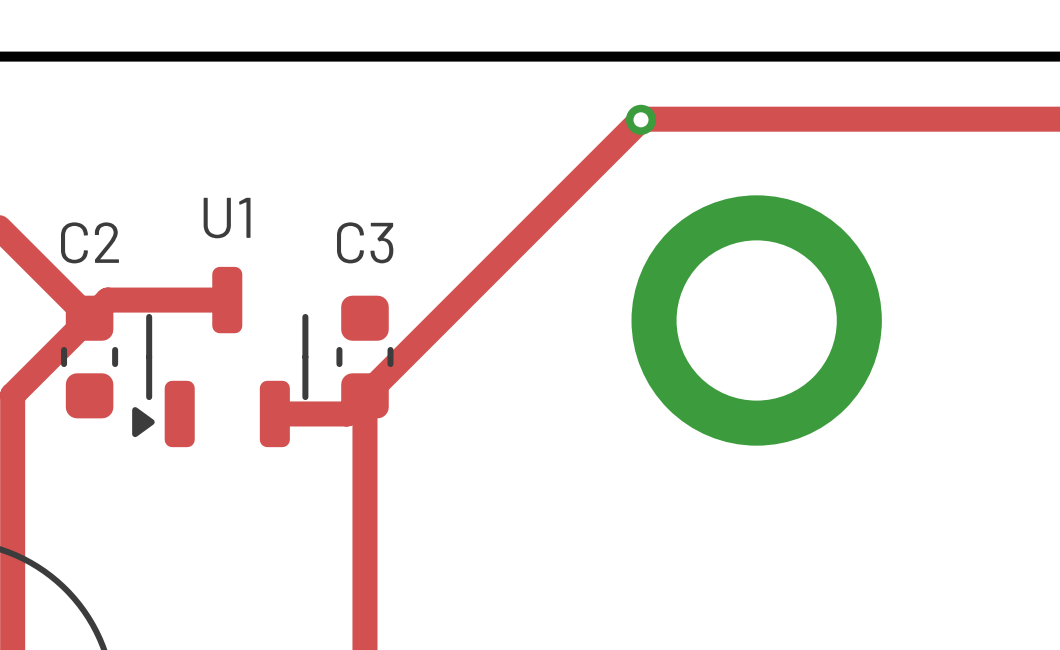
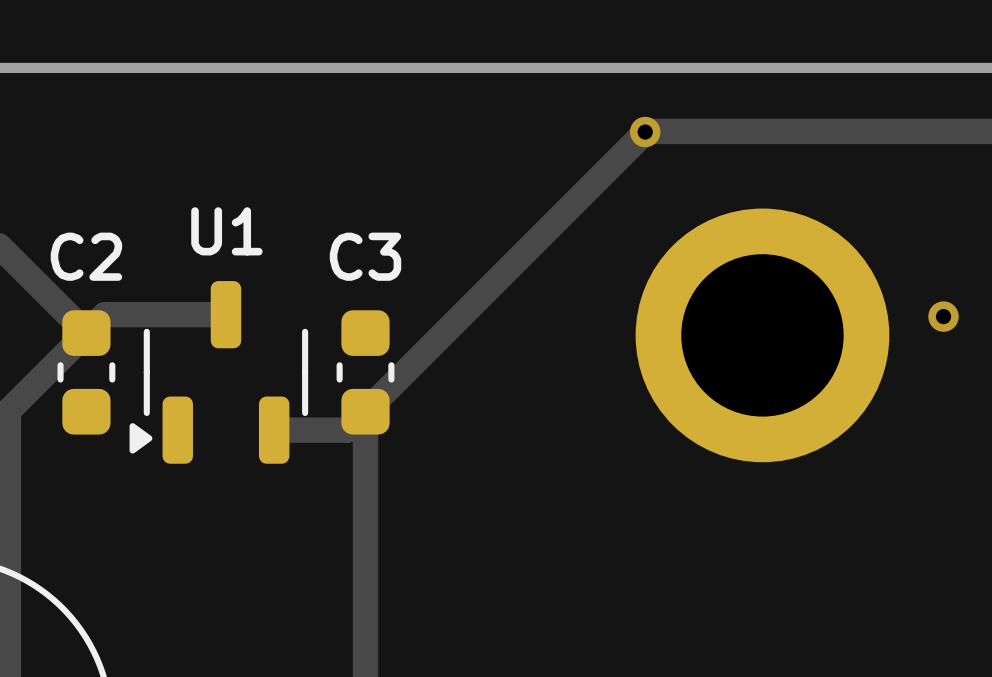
via: none -> (943, 316)

